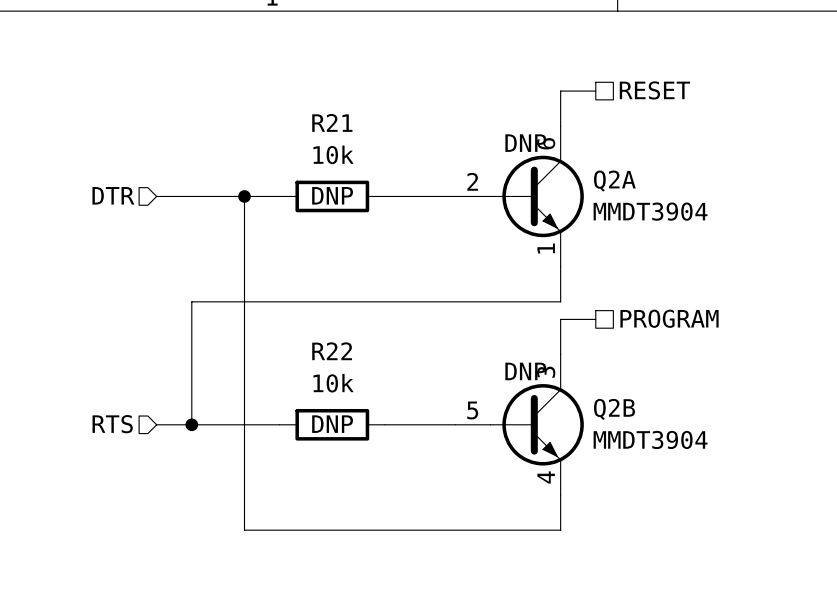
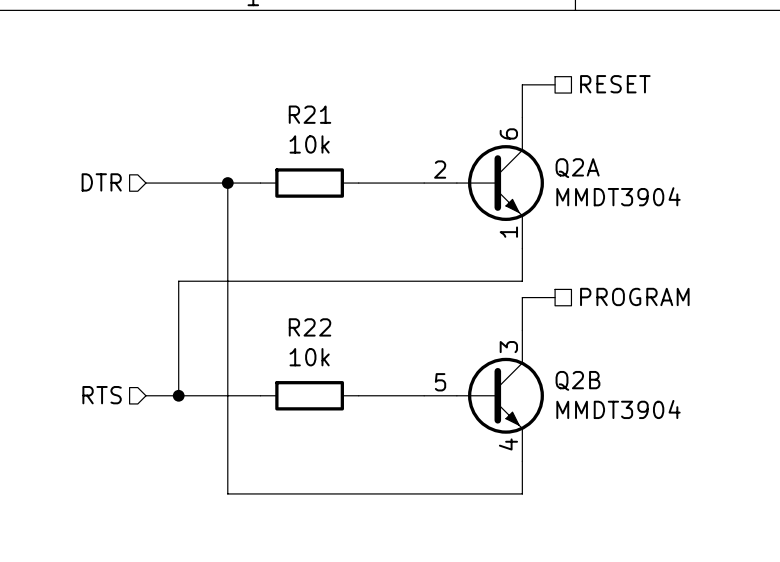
Q2A text: DNP (525, 143) -> none
R21 text: DNP (332, 195) -> none
Q2B text: DNP (525, 371) -> none
R22 text: DNP (332, 424) -> none

